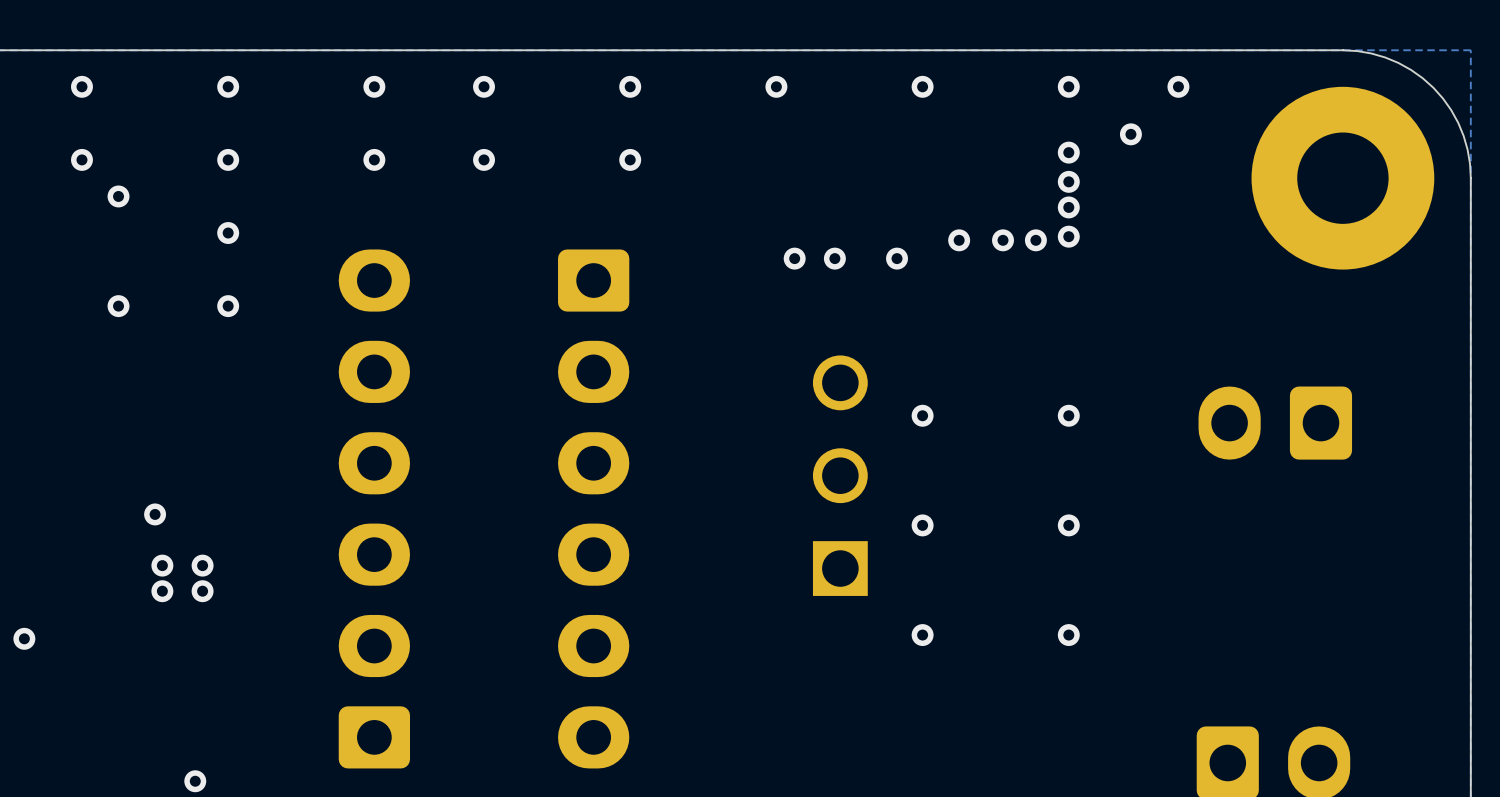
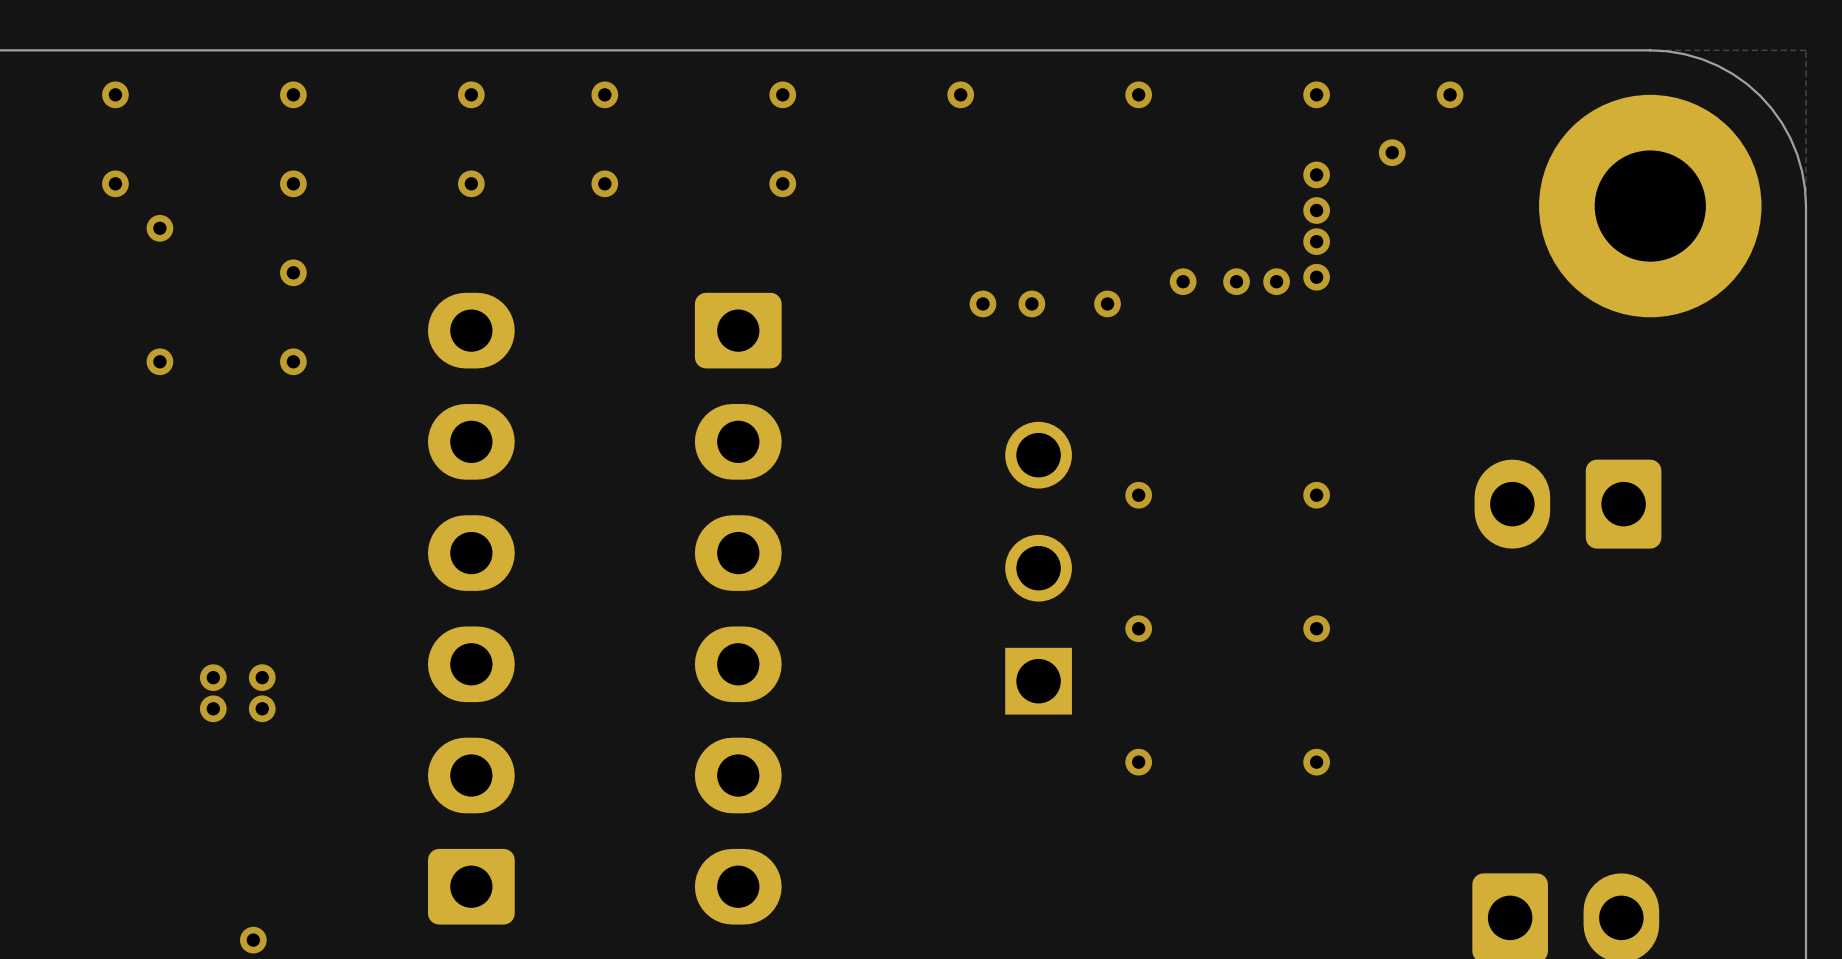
via: (155, 514) -> none
via: (24, 638) -> none

